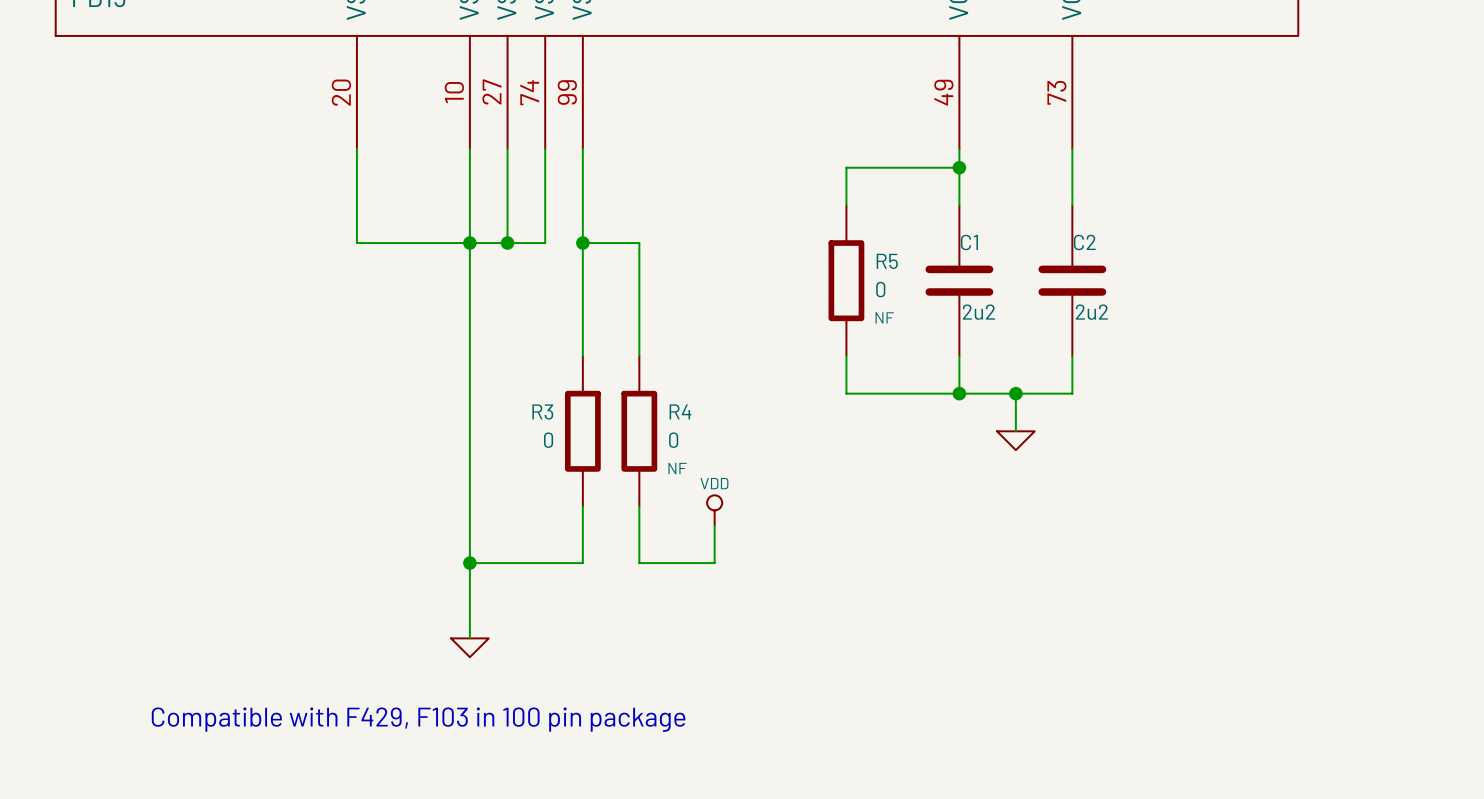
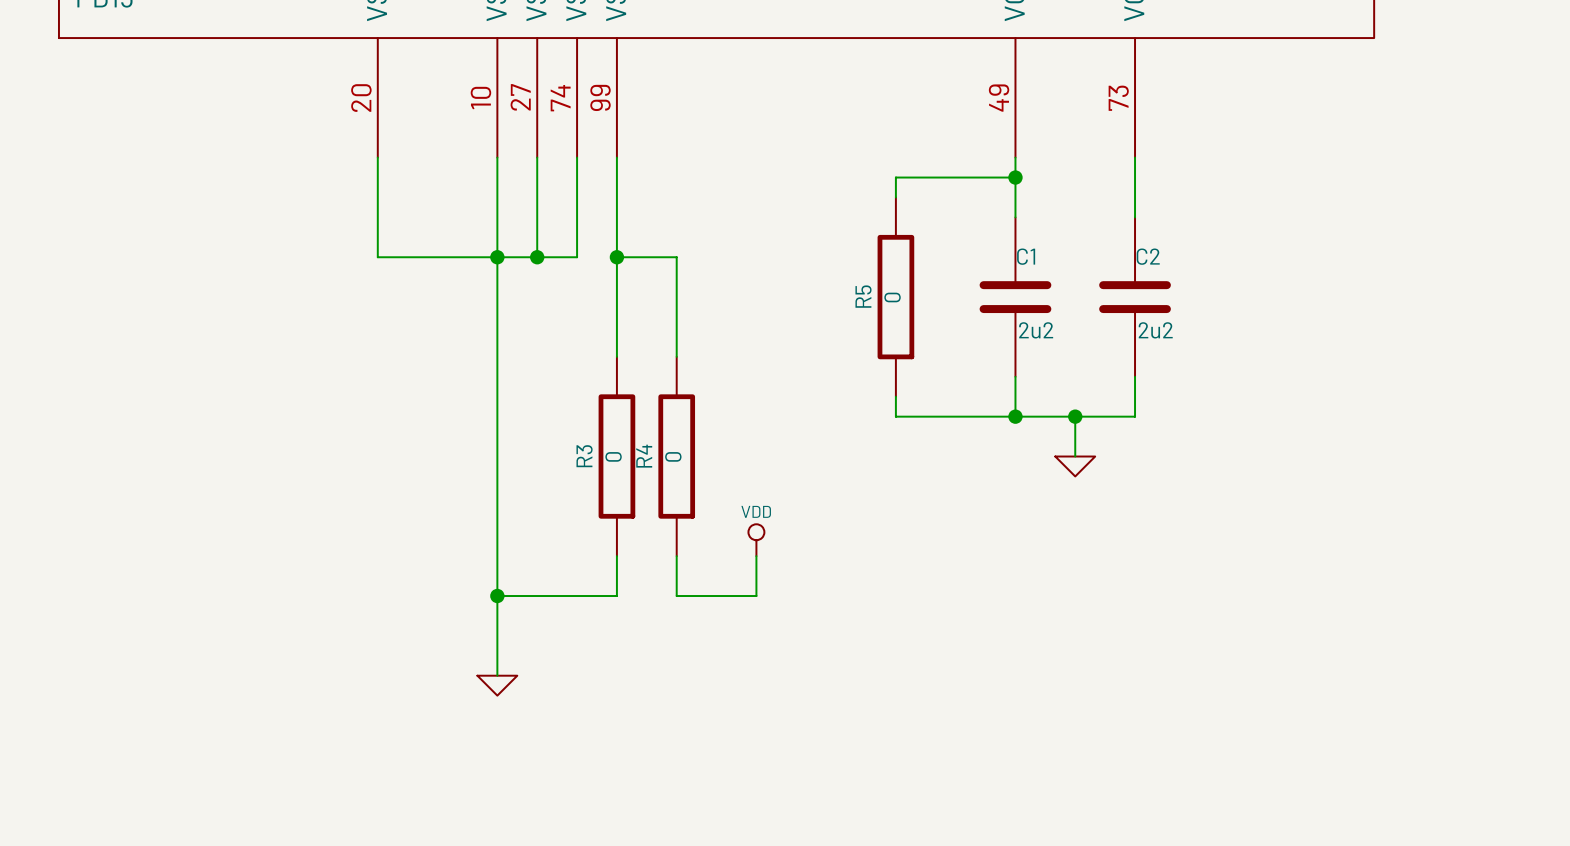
R5 symbol: [828, 205, 865, 356] -> [877, 197, 915, 397]
R5 name position: R5 (887, 261) -> R5 (863, 296)
R5 value position: 0 (880, 289) -> 0 (892, 297)
R5 text: NF (884, 317) -> none
R3 symbol: [564, 355, 601, 507] -> [598, 356, 636, 557]
R4 symbol: [621, 355, 658, 507] -> [658, 356, 696, 557]
R4 name position: R4 (680, 411) -> R4 (644, 456)
R3 value position: 0 (548, 440) -> 0 (613, 456)
R4 value position: 0 (673, 440) -> 0 (673, 456)
R4 text: NF (677, 468) -> none
text: Compatible with F429, F103 in 100 pin package (418, 719) -> none

